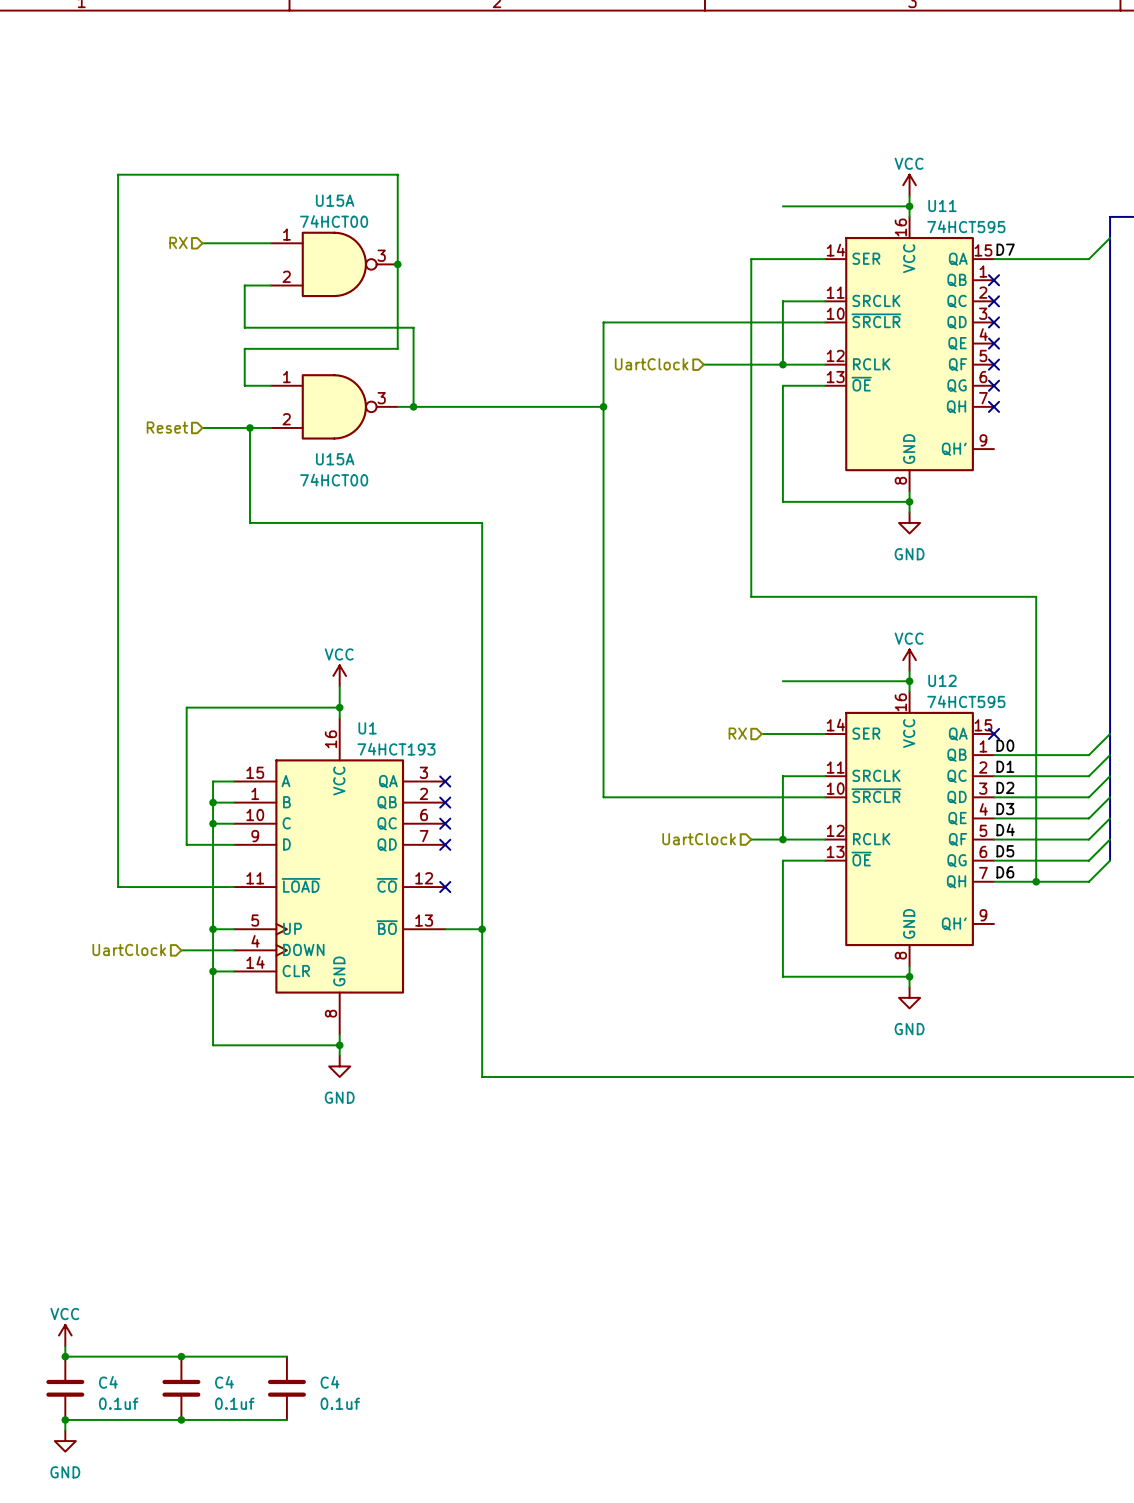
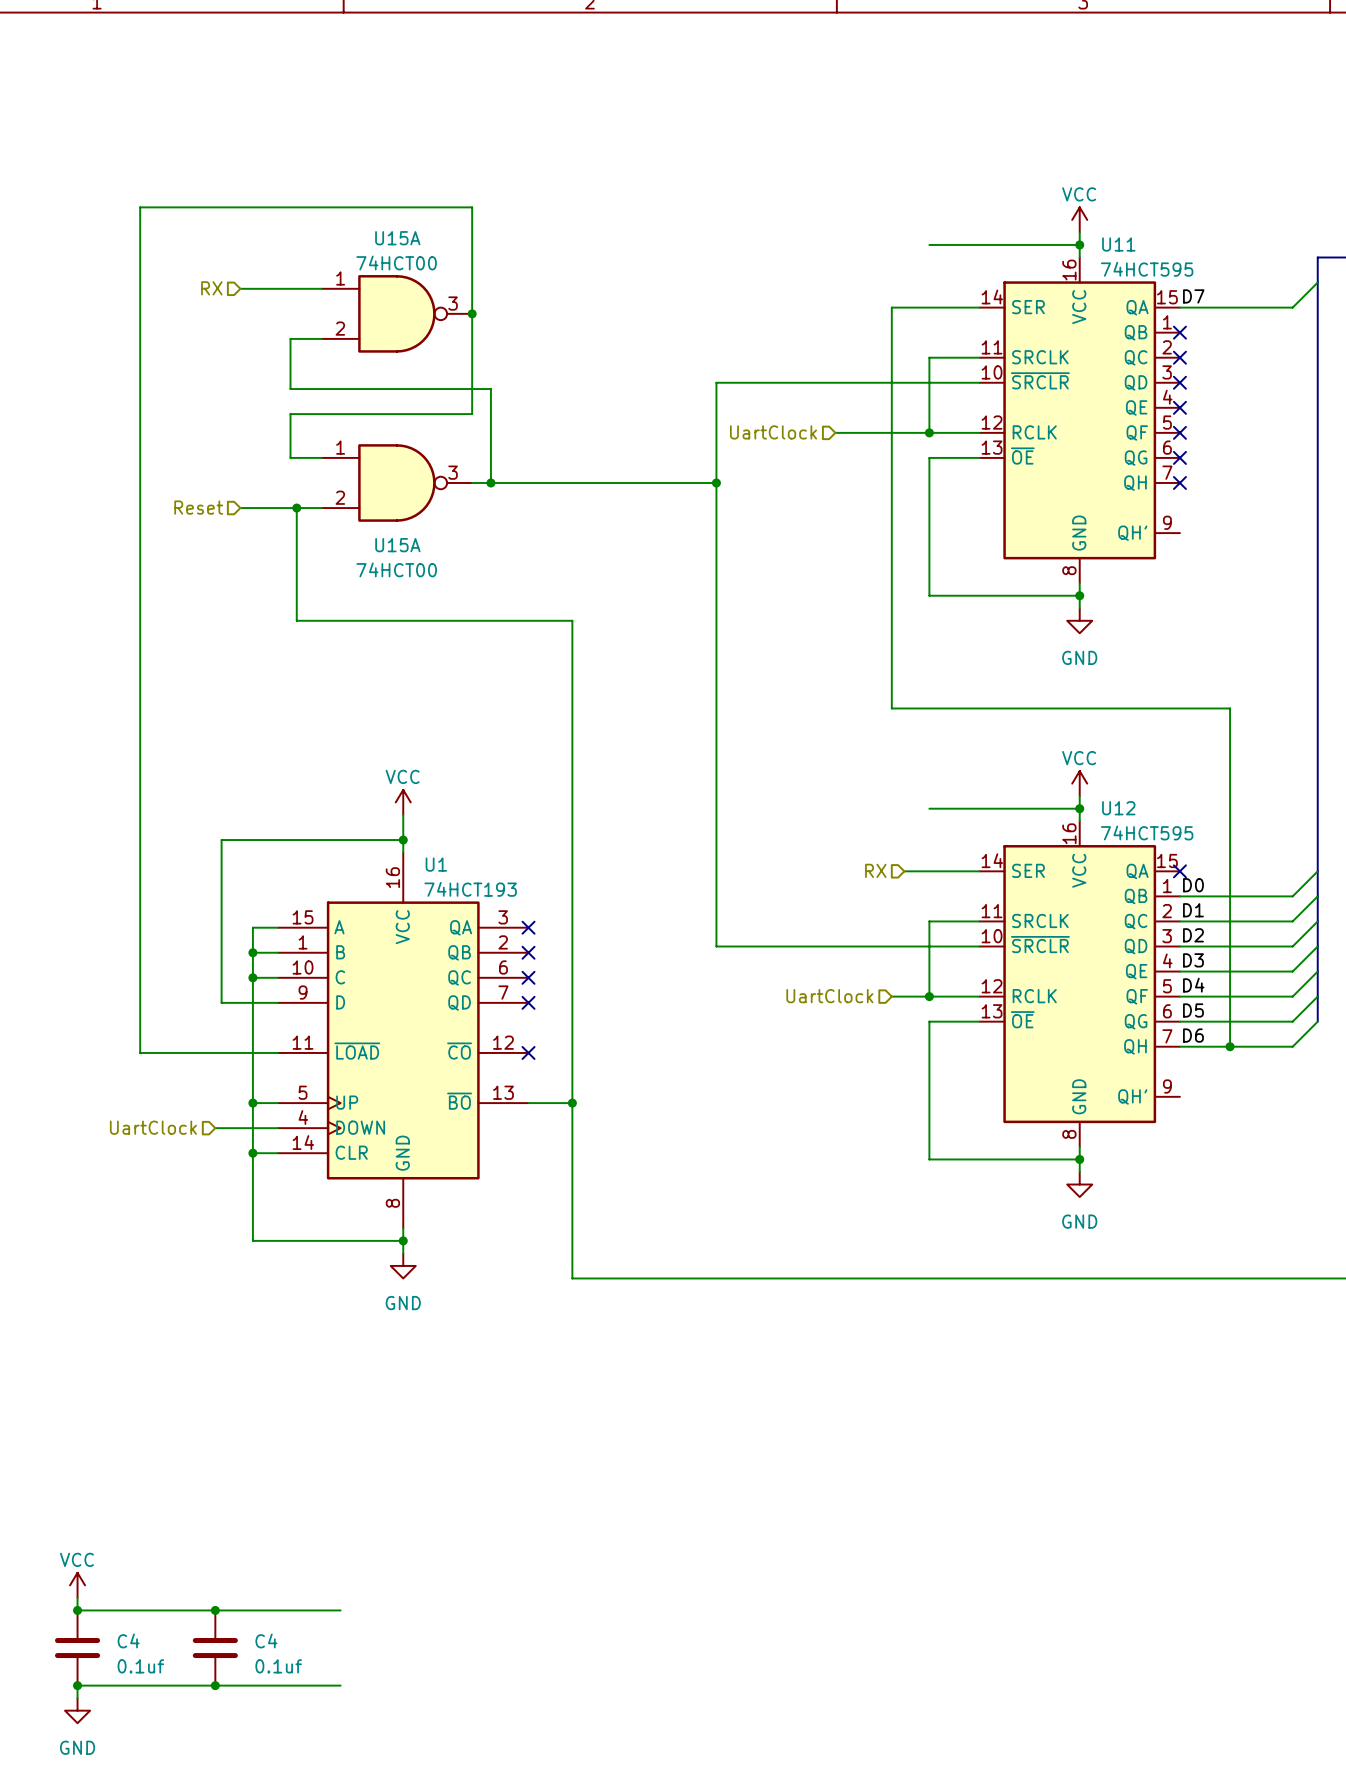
C4: 0.1uf (286, 1388) -> none

